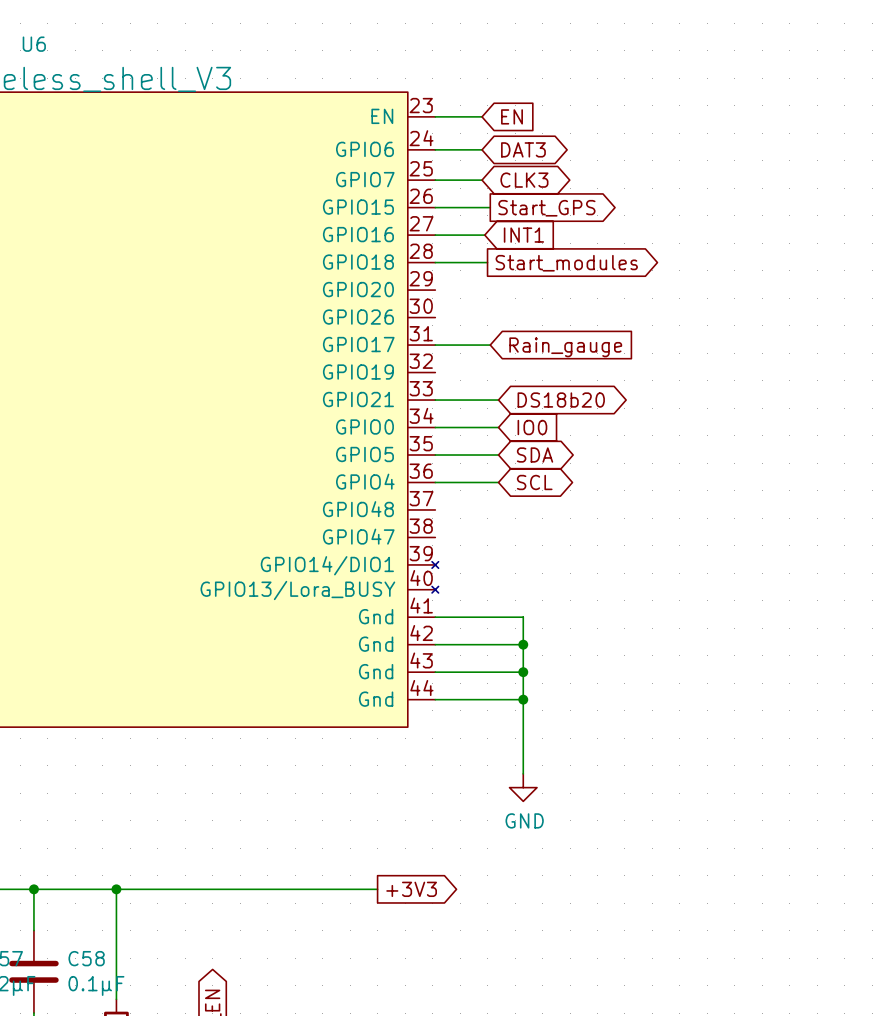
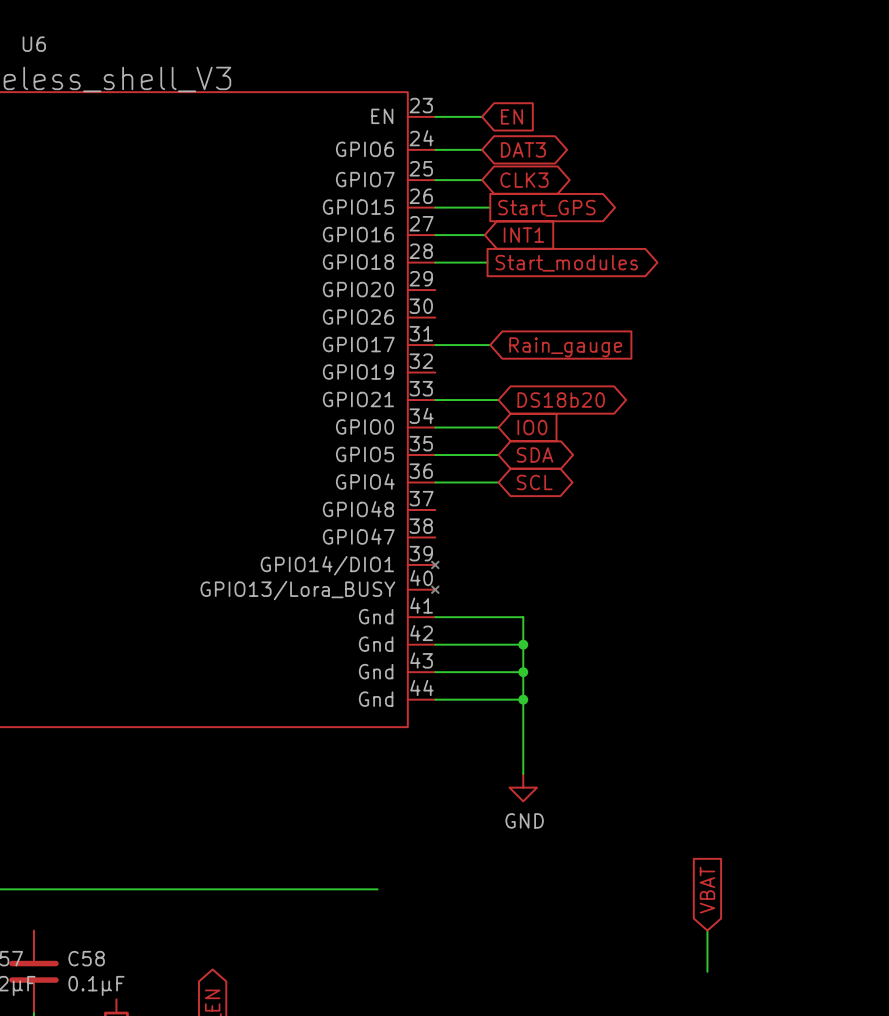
wire: (33, 889) (33, 930) -> none
junction: (33, 889) -> none
wire: (116, 889) (116, 999) -> none
junction: (116, 889) -> none
global label: +3V3 (411, 889) -> none
global label: none -> VBAT (707, 890)
wire: none -> (707, 930) (707, 971)

